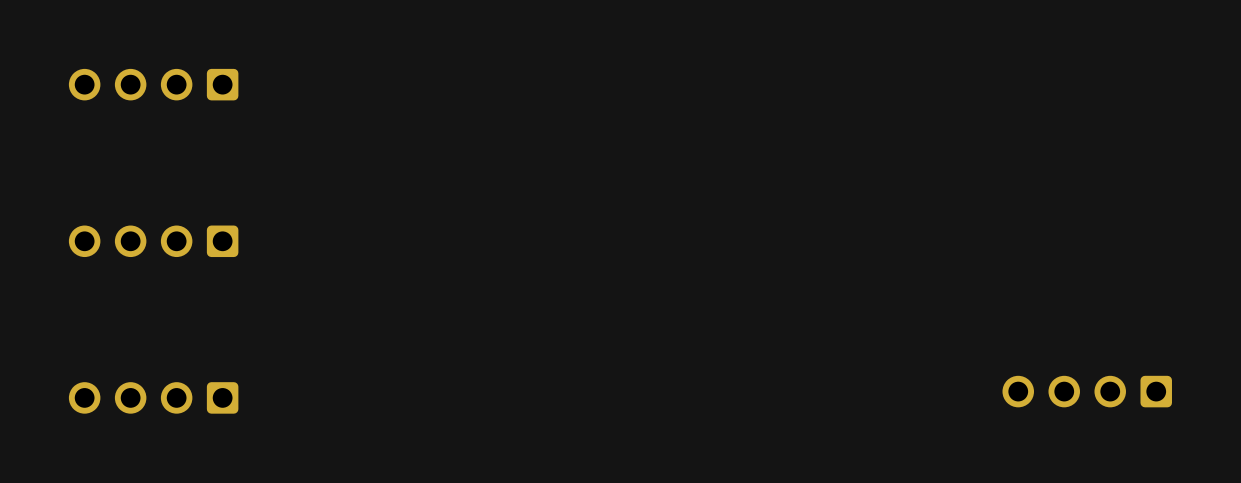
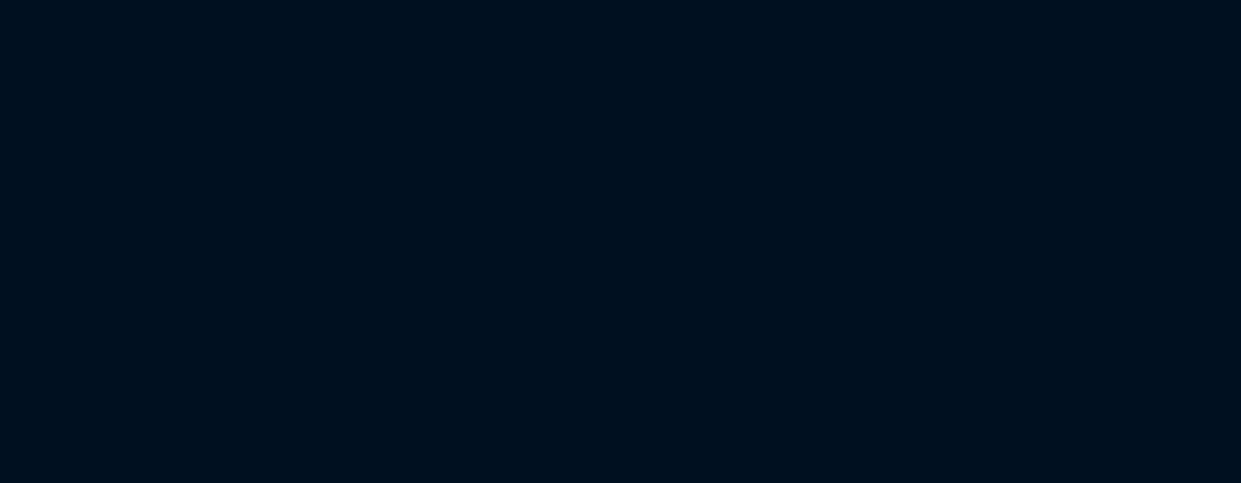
part: (153, 84) -> none
part: (153, 241) -> none
part: (1087, 391) -> none
part: (153, 397) -> none

